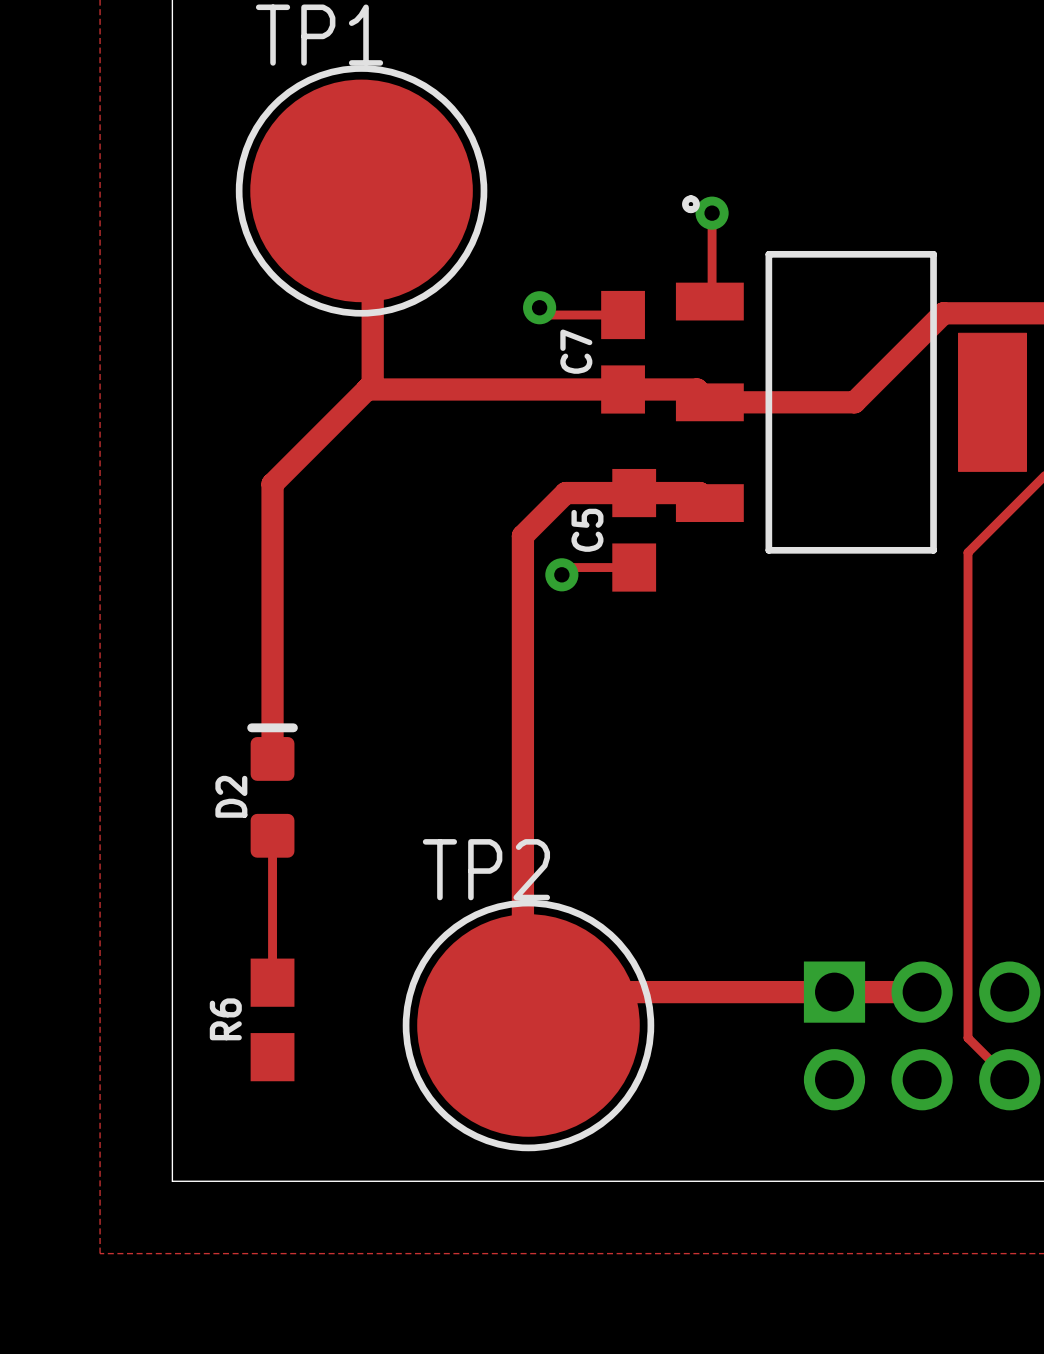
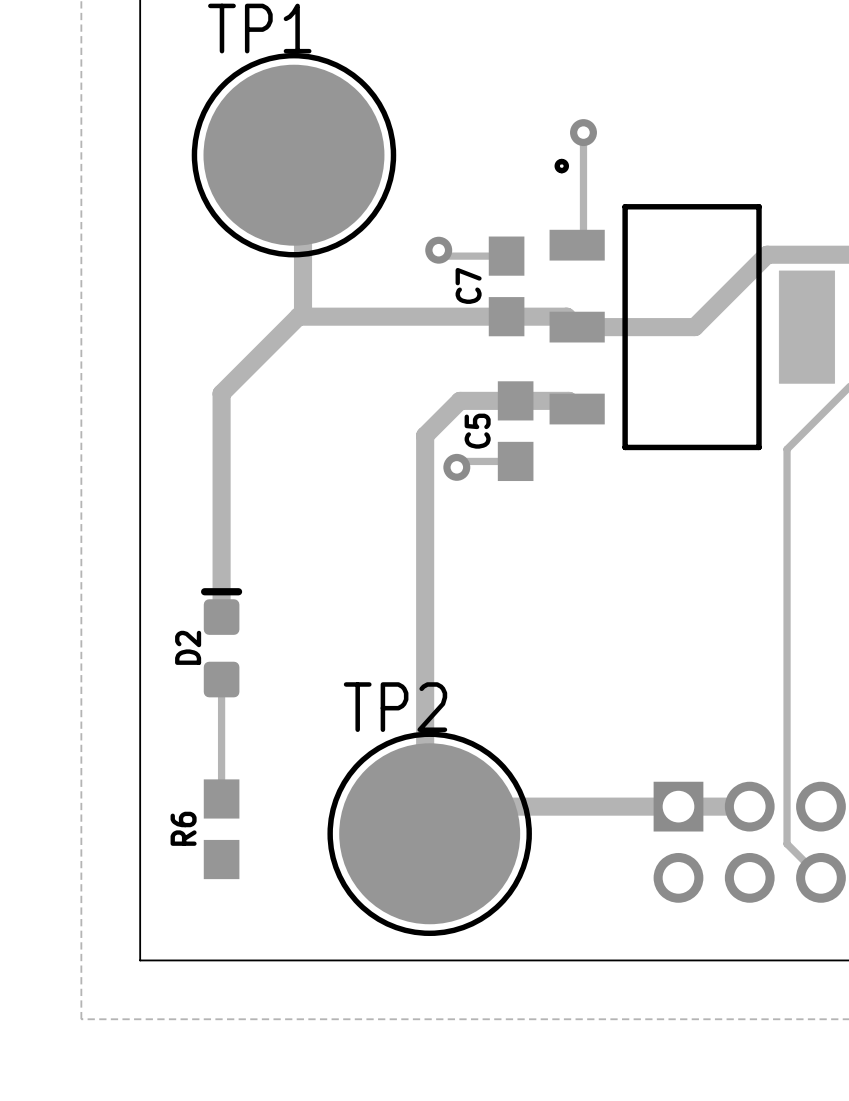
track: (712, 213) (712, 299) -> (583, 132) (583, 238) (578, 243)
via position: (712, 213) -> (583, 132)

